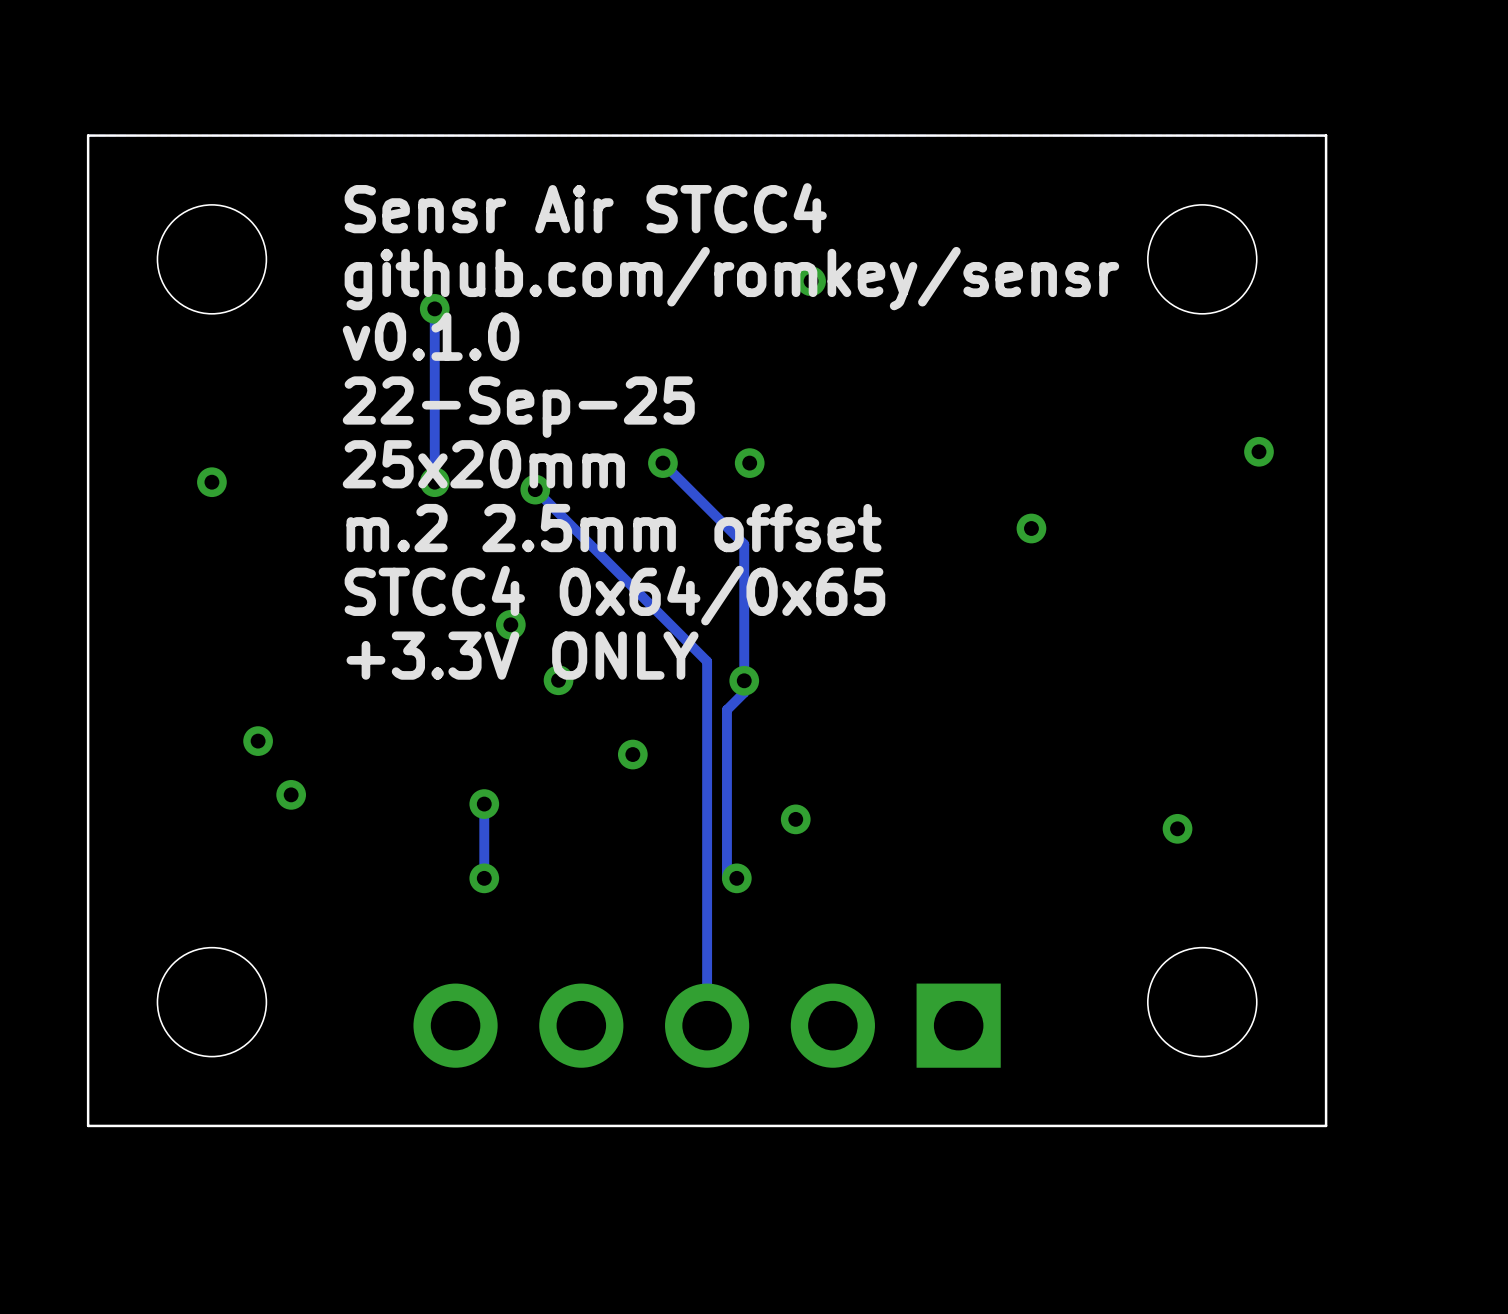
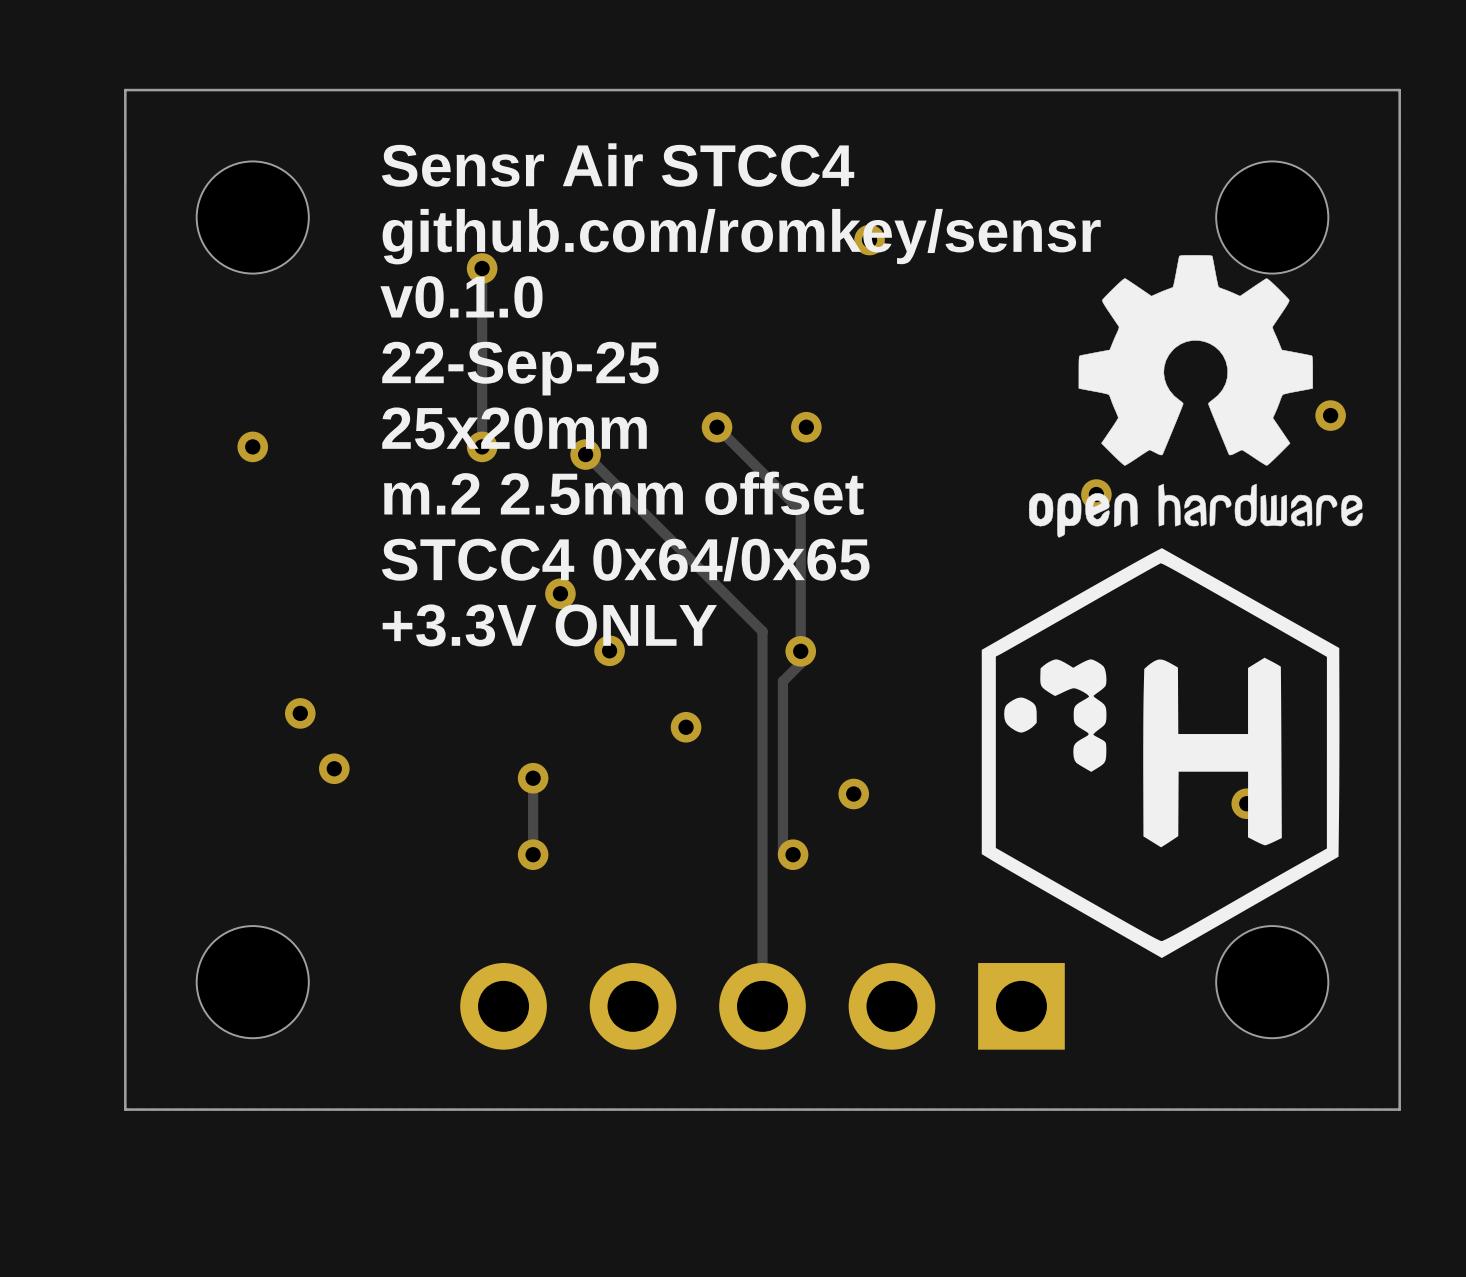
drawing: none -> [981, 255, 1363, 959]

